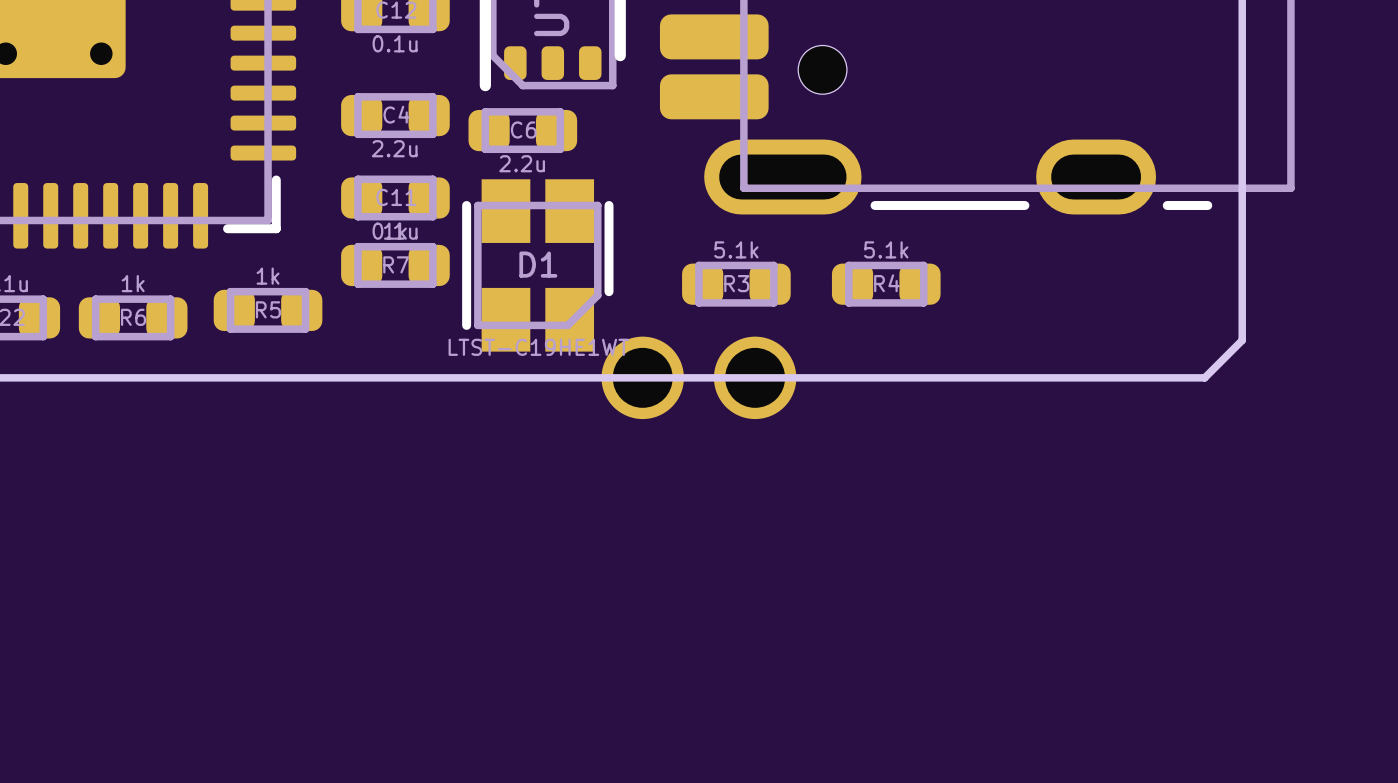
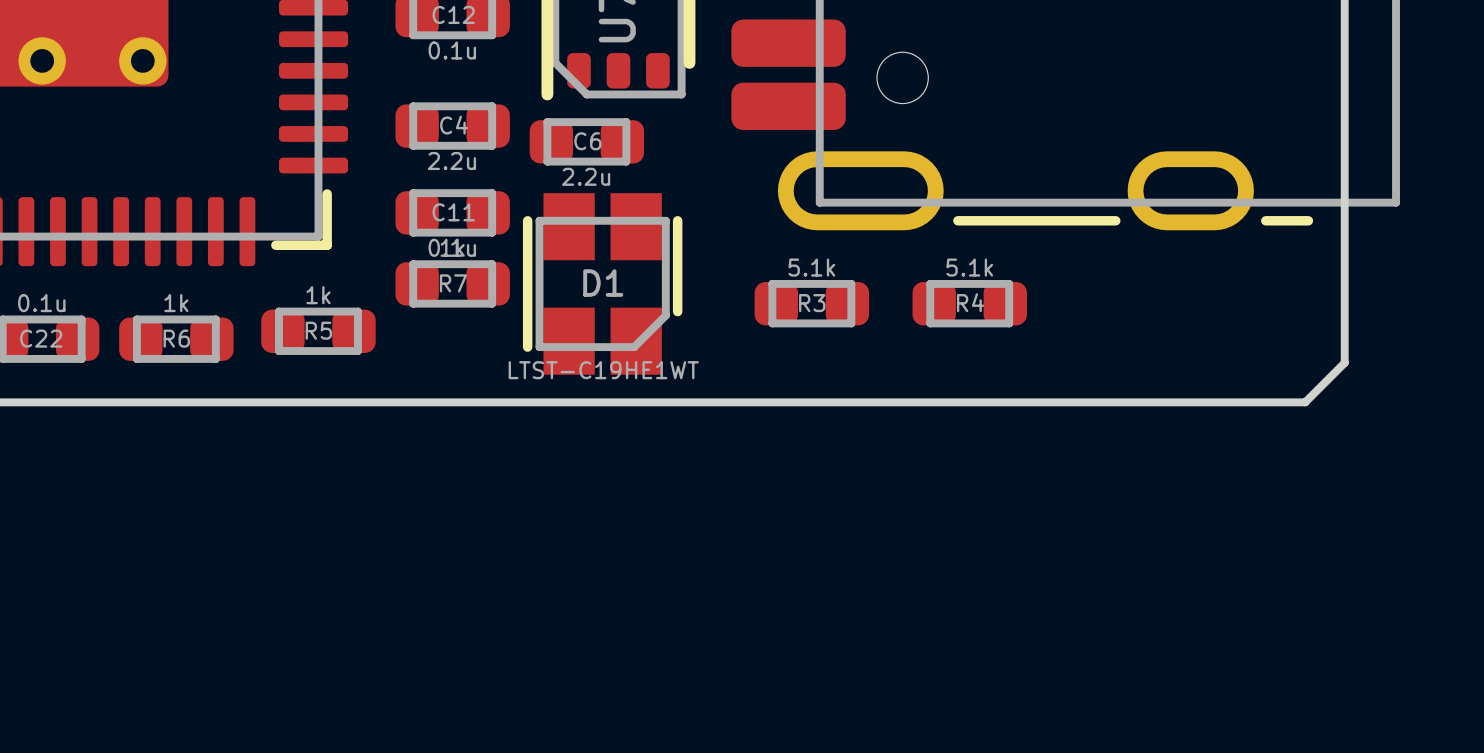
part: (698, 377) -> none

